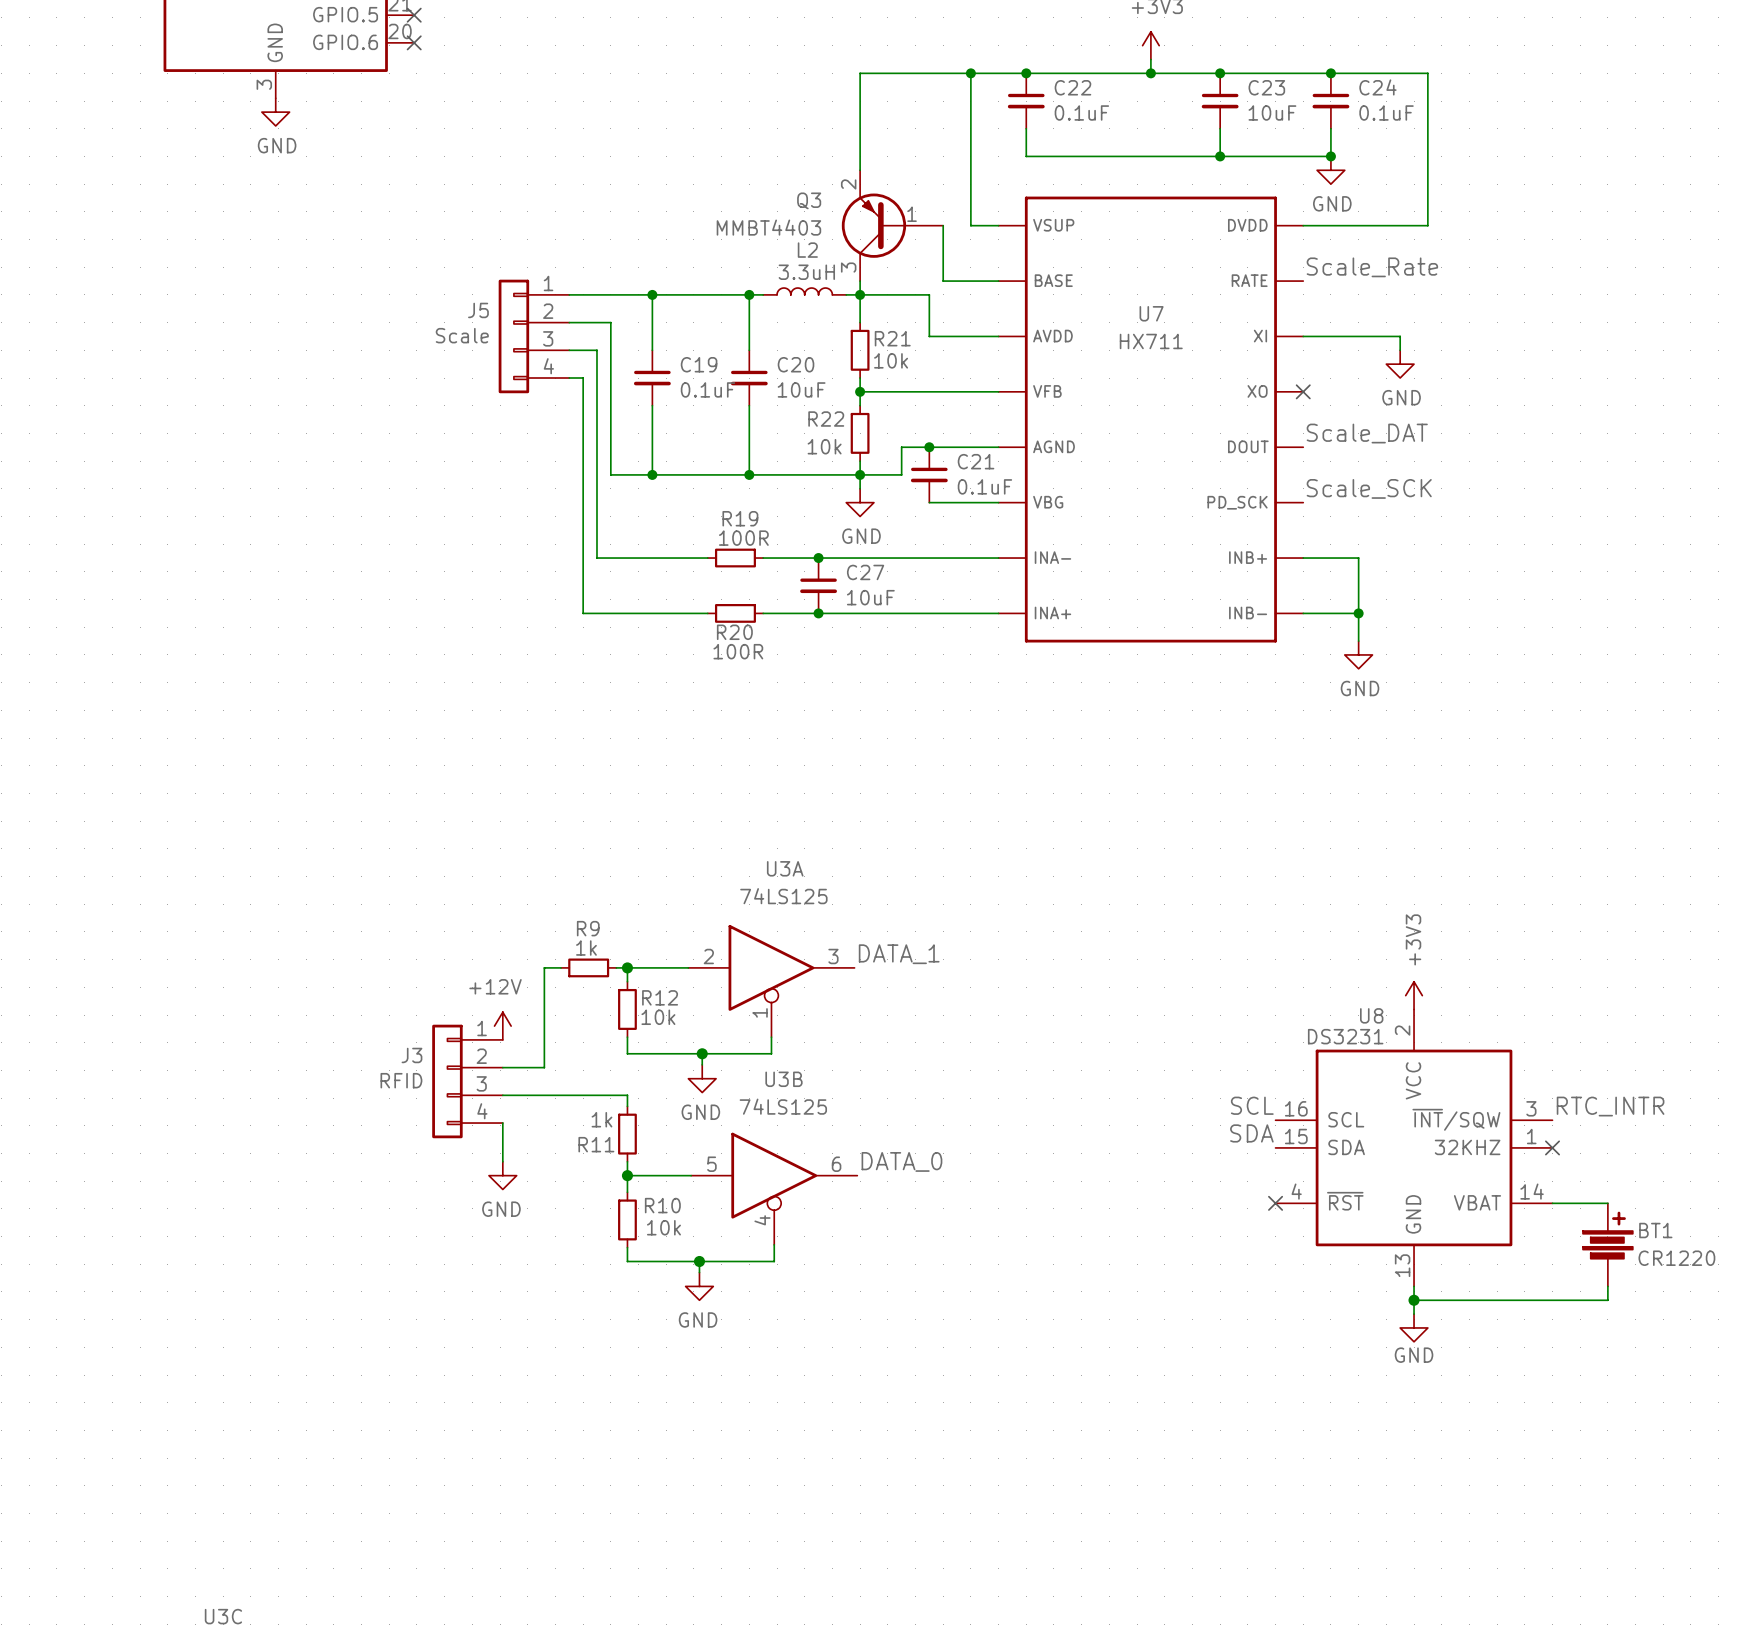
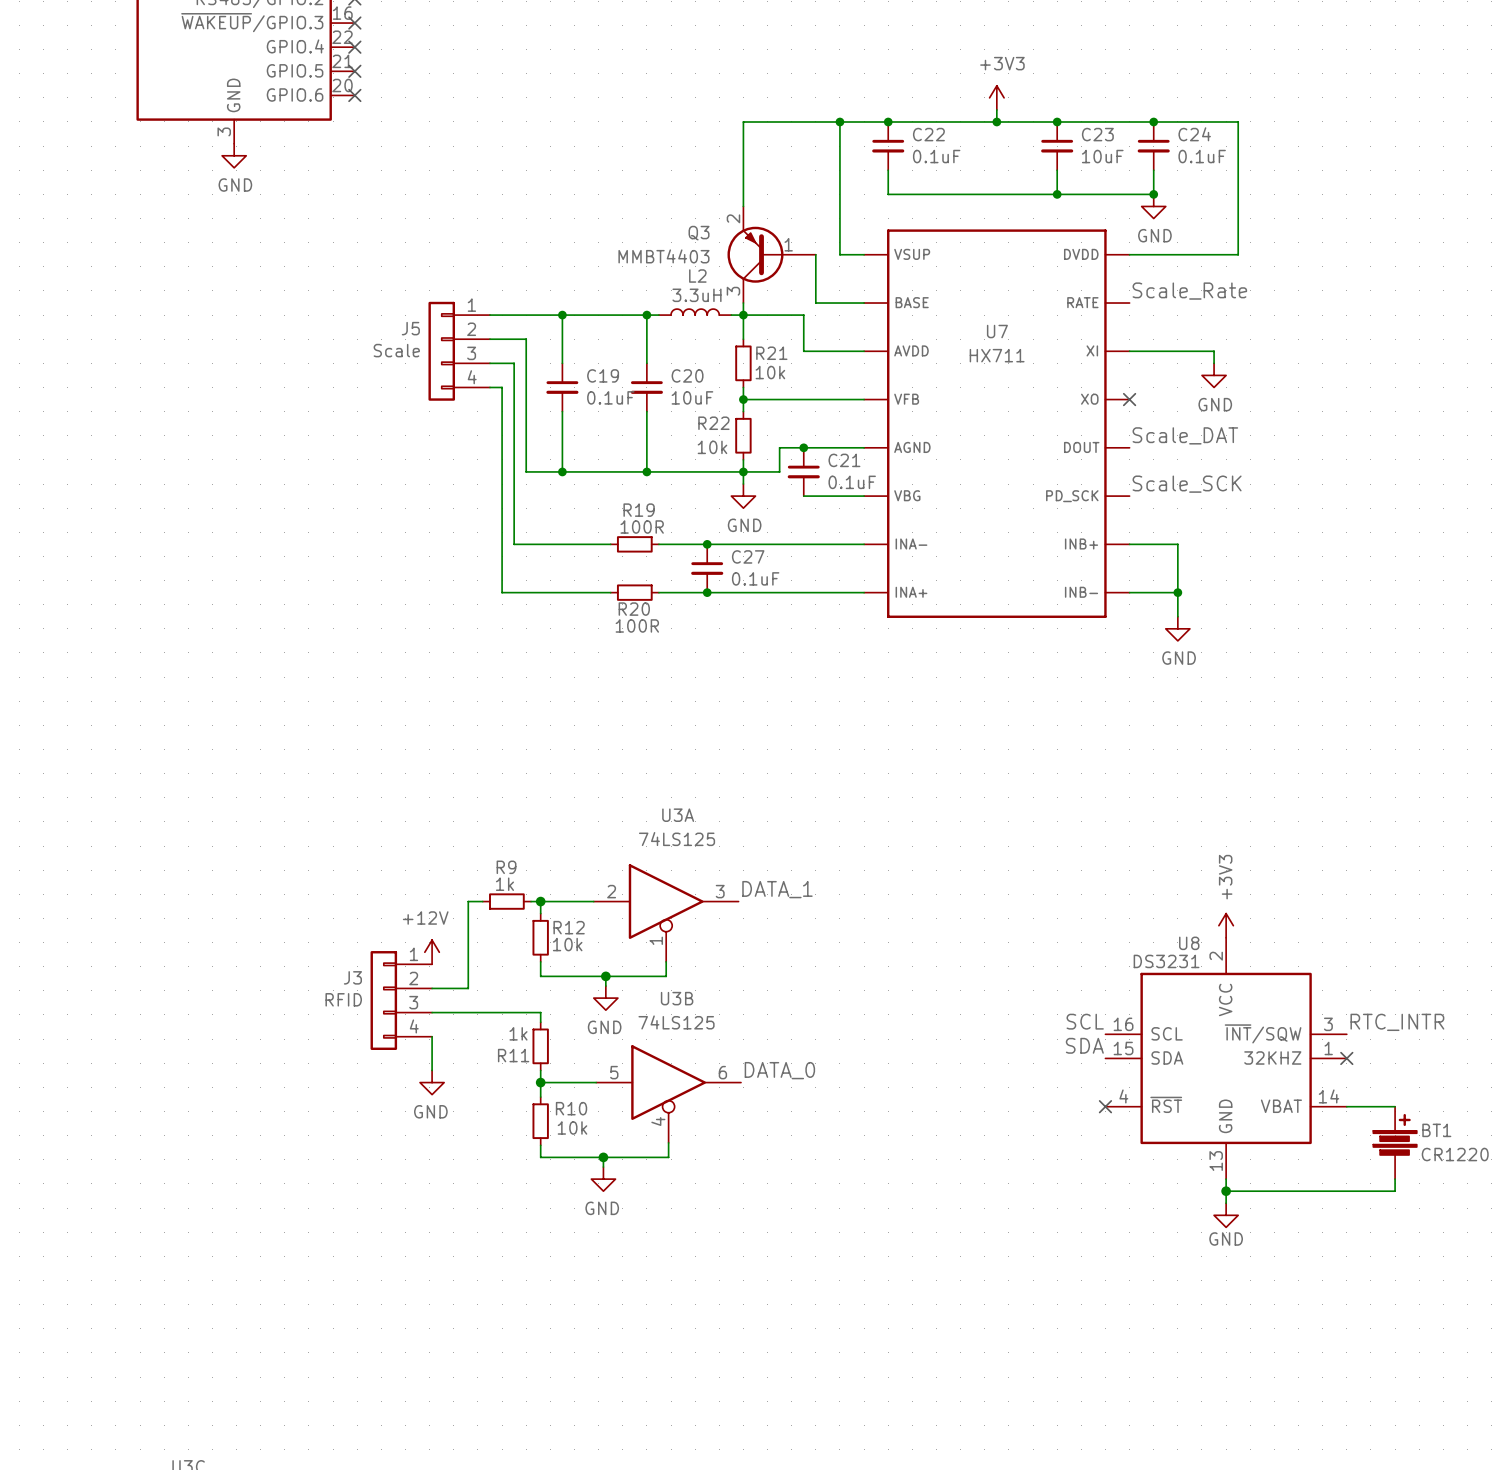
C27 value: 10uF (870, 597) -> 0.1uF (755, 578)

